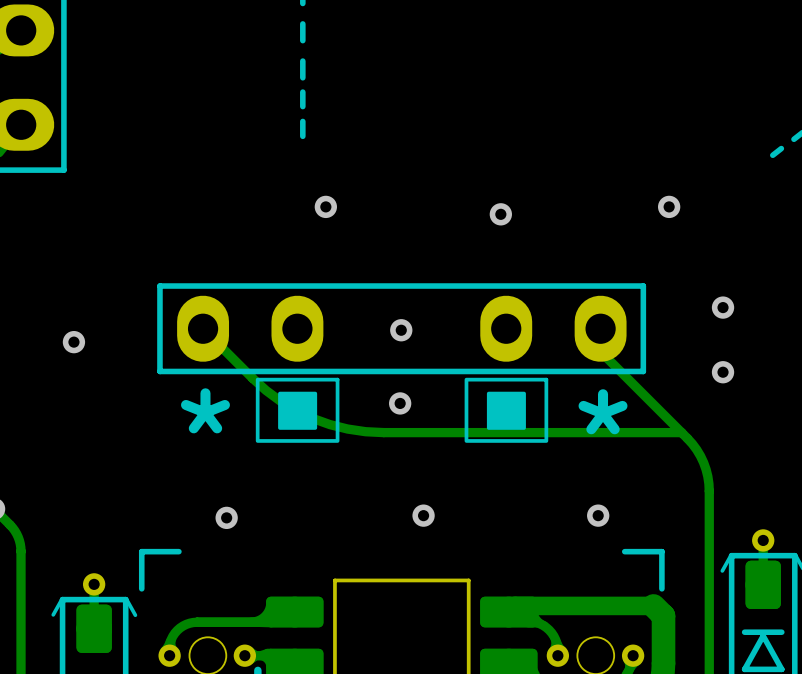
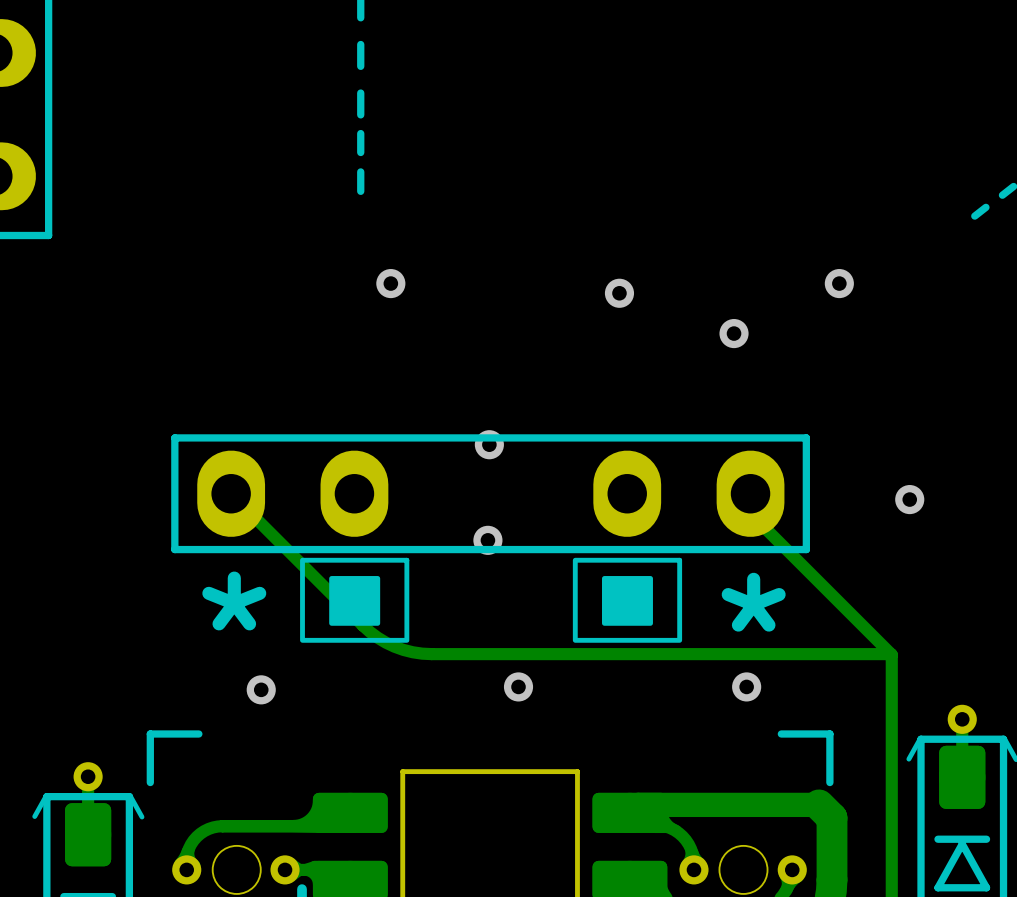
via position: (723, 307) -> (734, 333)
track: (203, 328) (252, 378) (280, 401) (312, 418) (347, 429) (383, 432) (681, 432) -> none
track: (600, 328) (600, 351) (692, 443) (706, 469) (709, 491) -> (750, 493) (750, 513) (891, 654)
via: (73, 342) -> none
part position: (401, 363) -> (490, 538)
track: none -> (231, 493) (370, 632) (394, 646) (412, 652) (431, 654) (891, 654)

